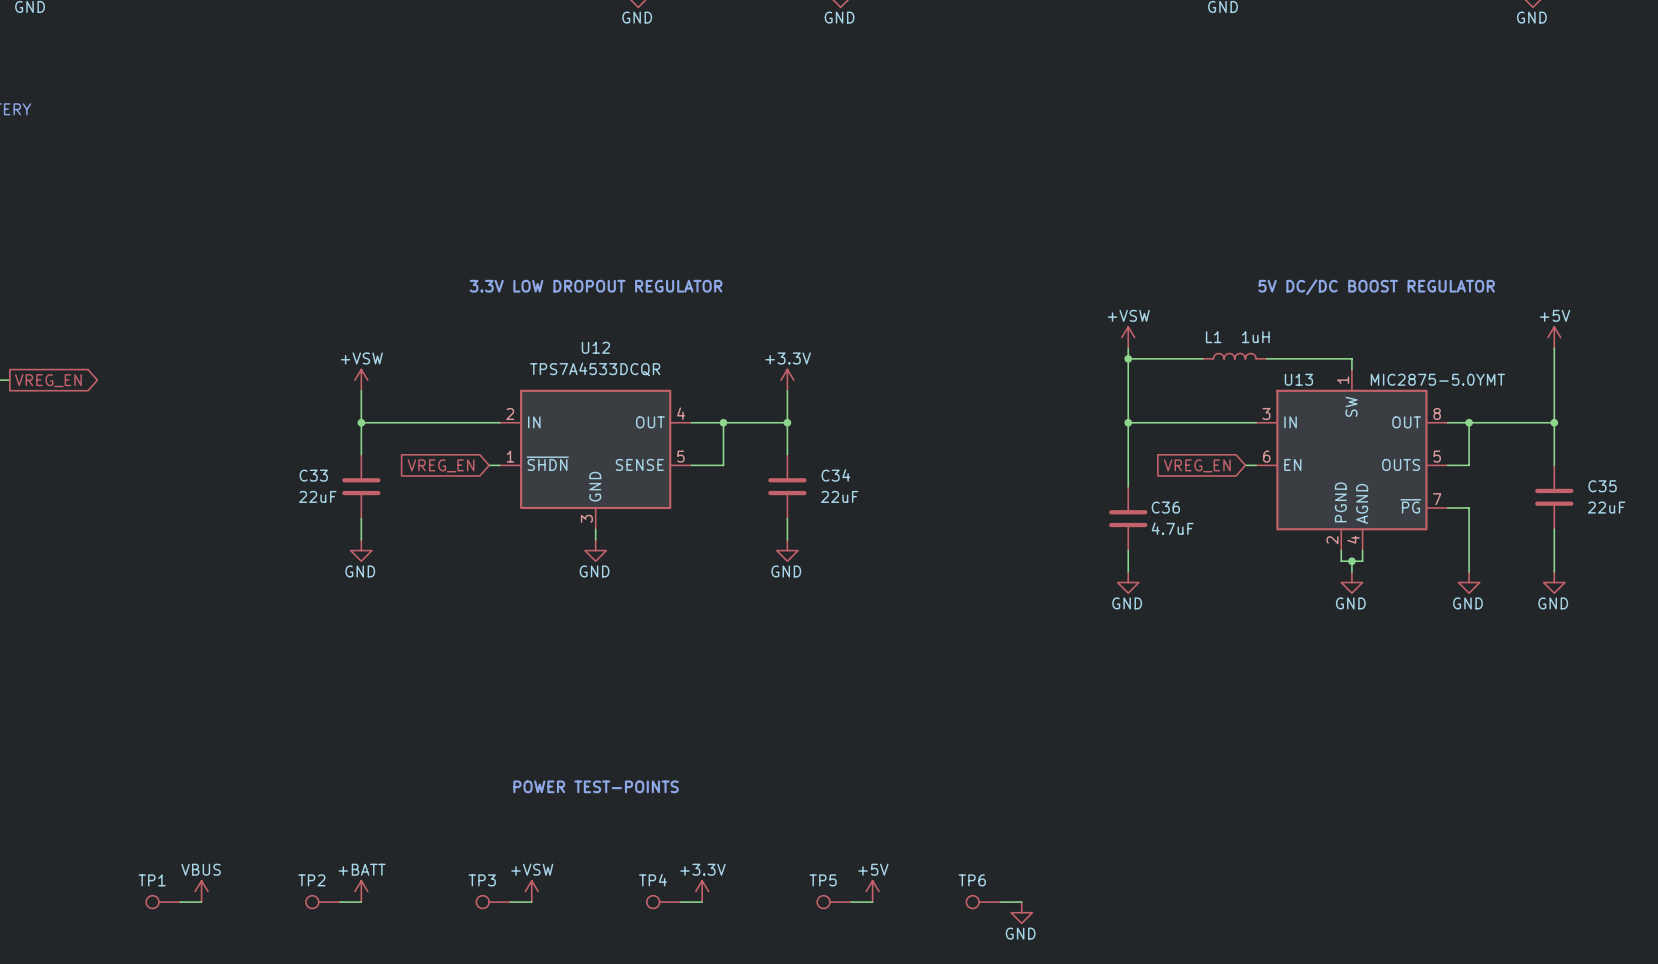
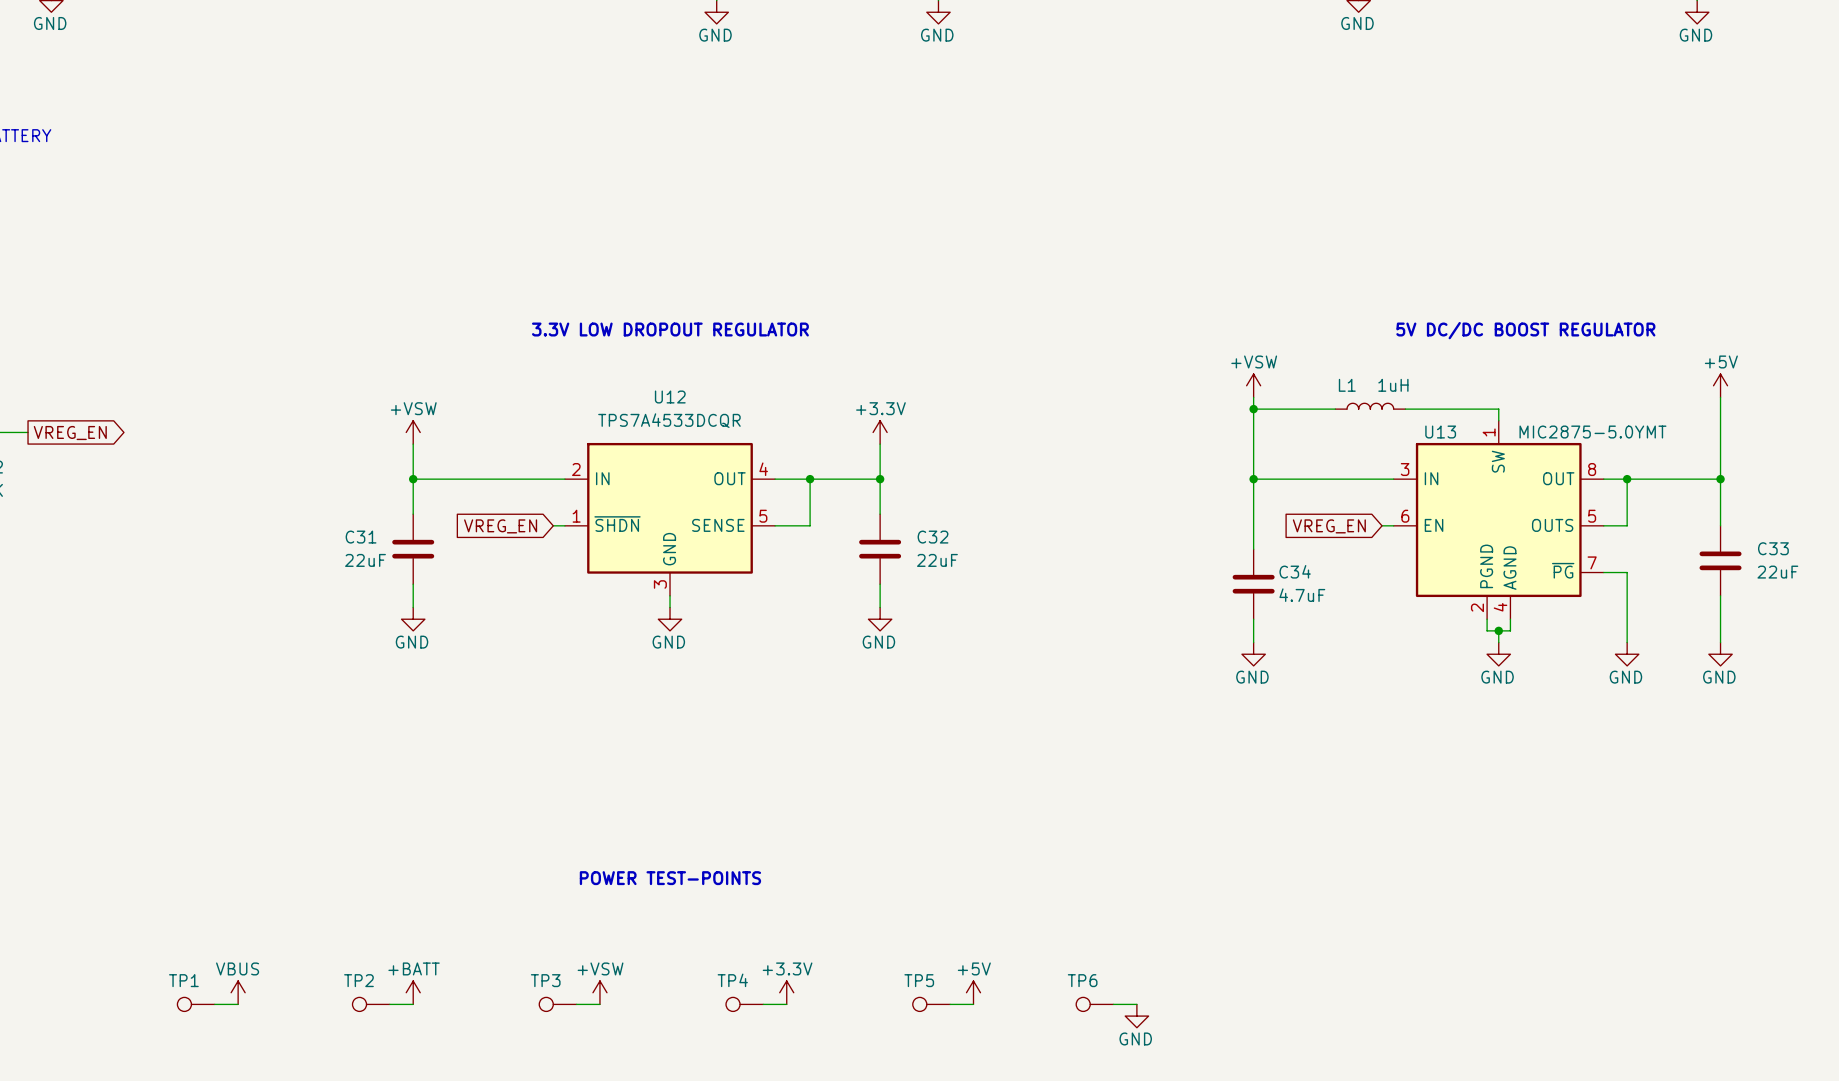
C33 name: C33 (313, 475) -> C31 (361, 537)
C34 name: C34 (835, 475) -> C32 (933, 537)
C35 name: C35 (1602, 486) -> C33 (1773, 548)
C36 name: C36 (1165, 507) -> C34 (1295, 571)

